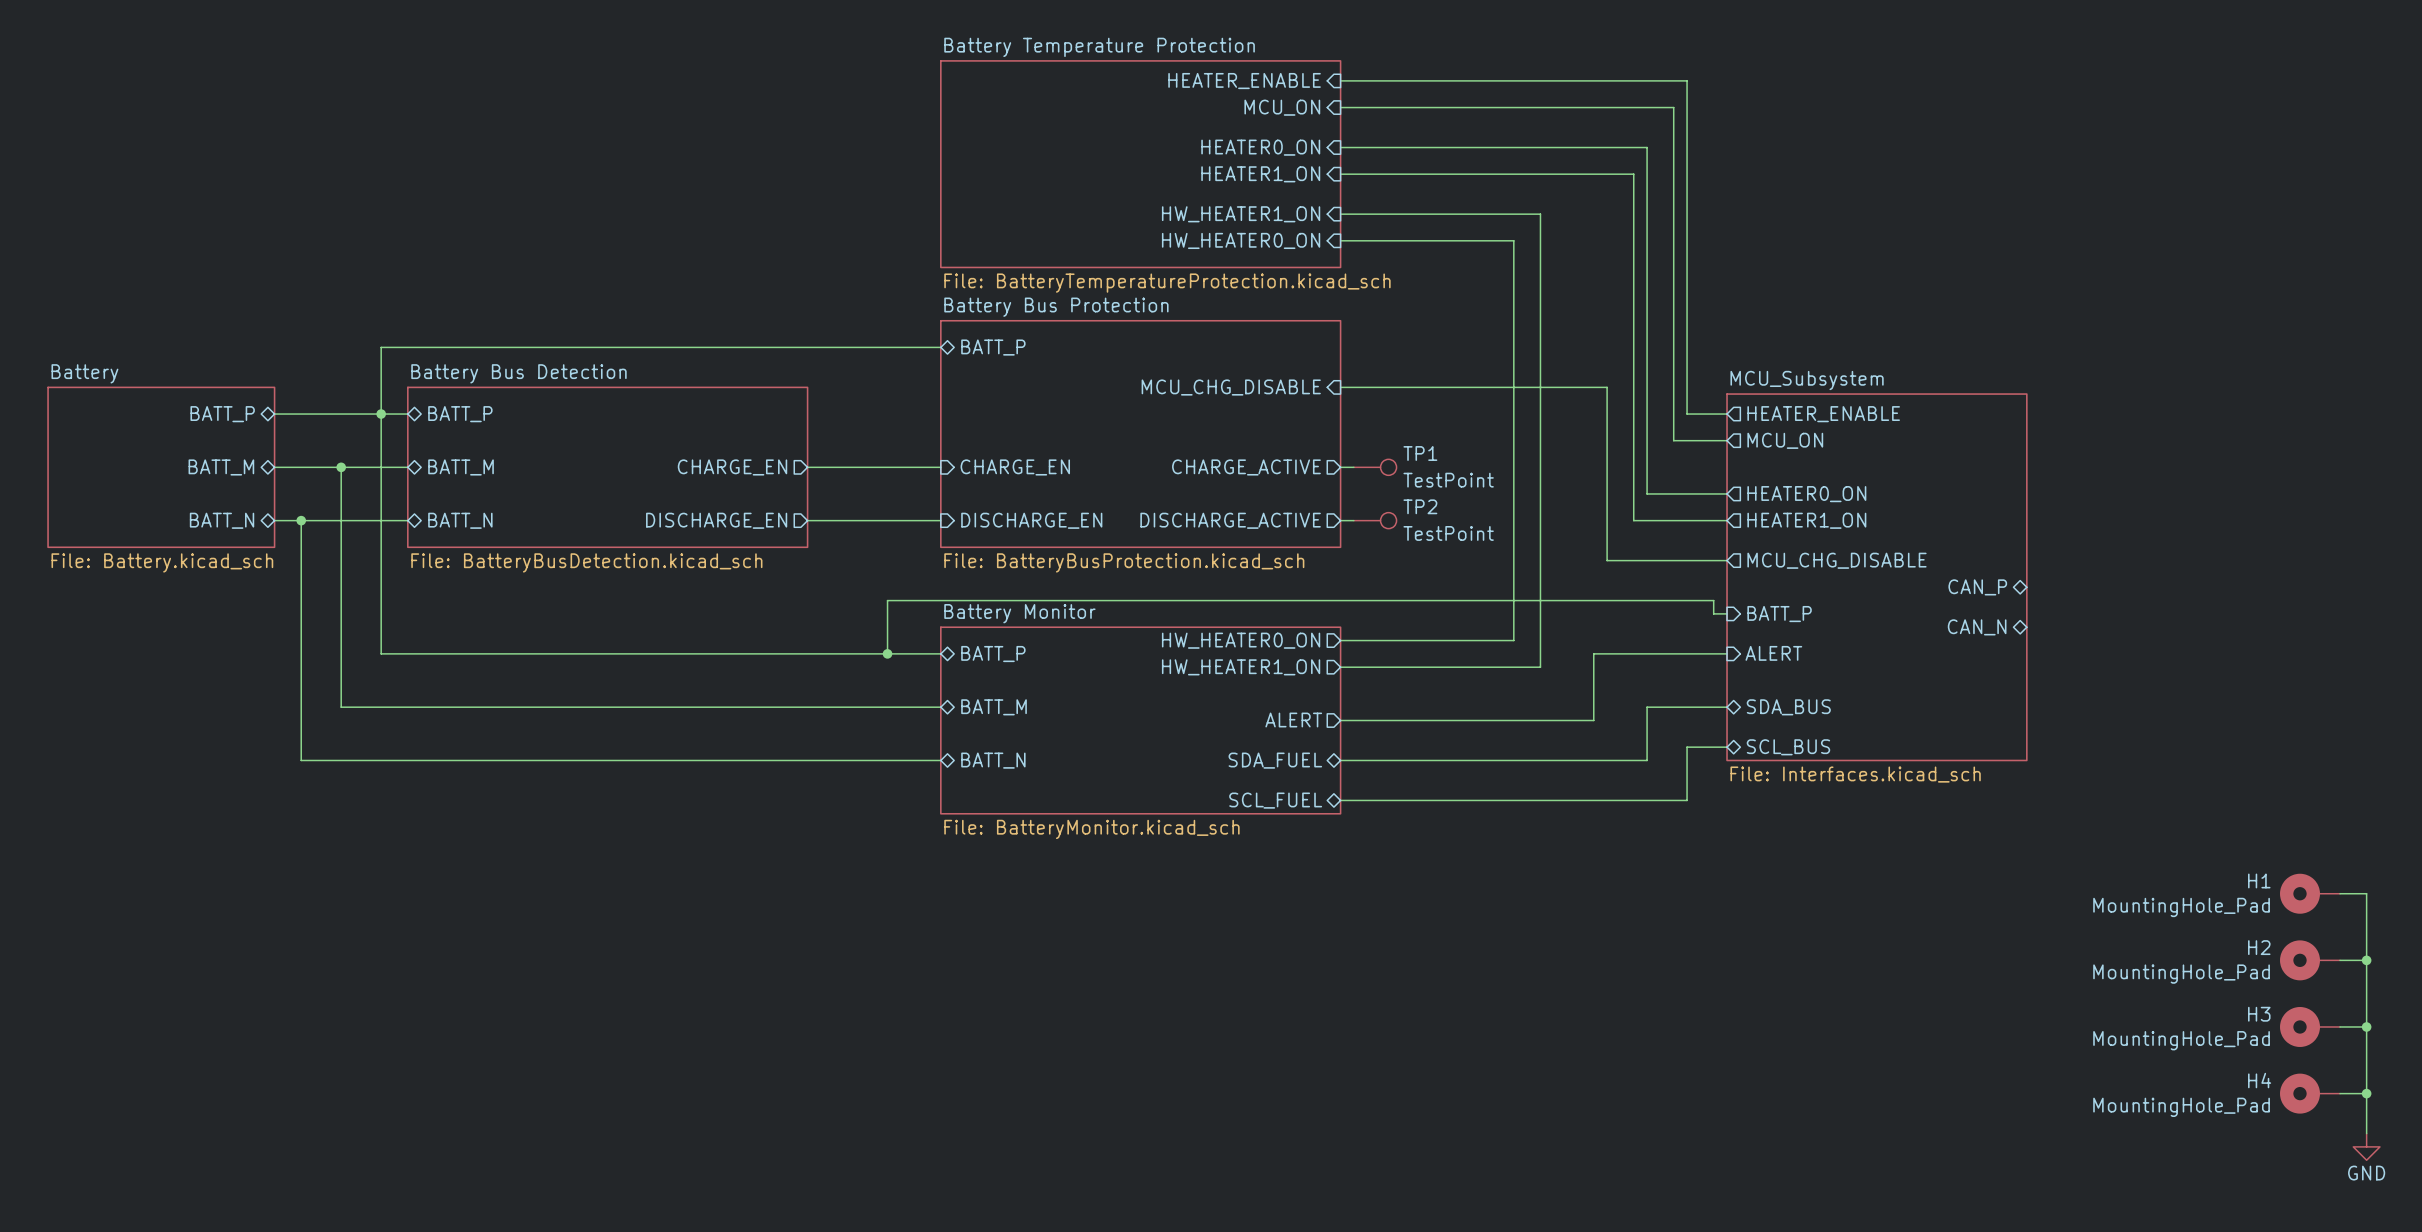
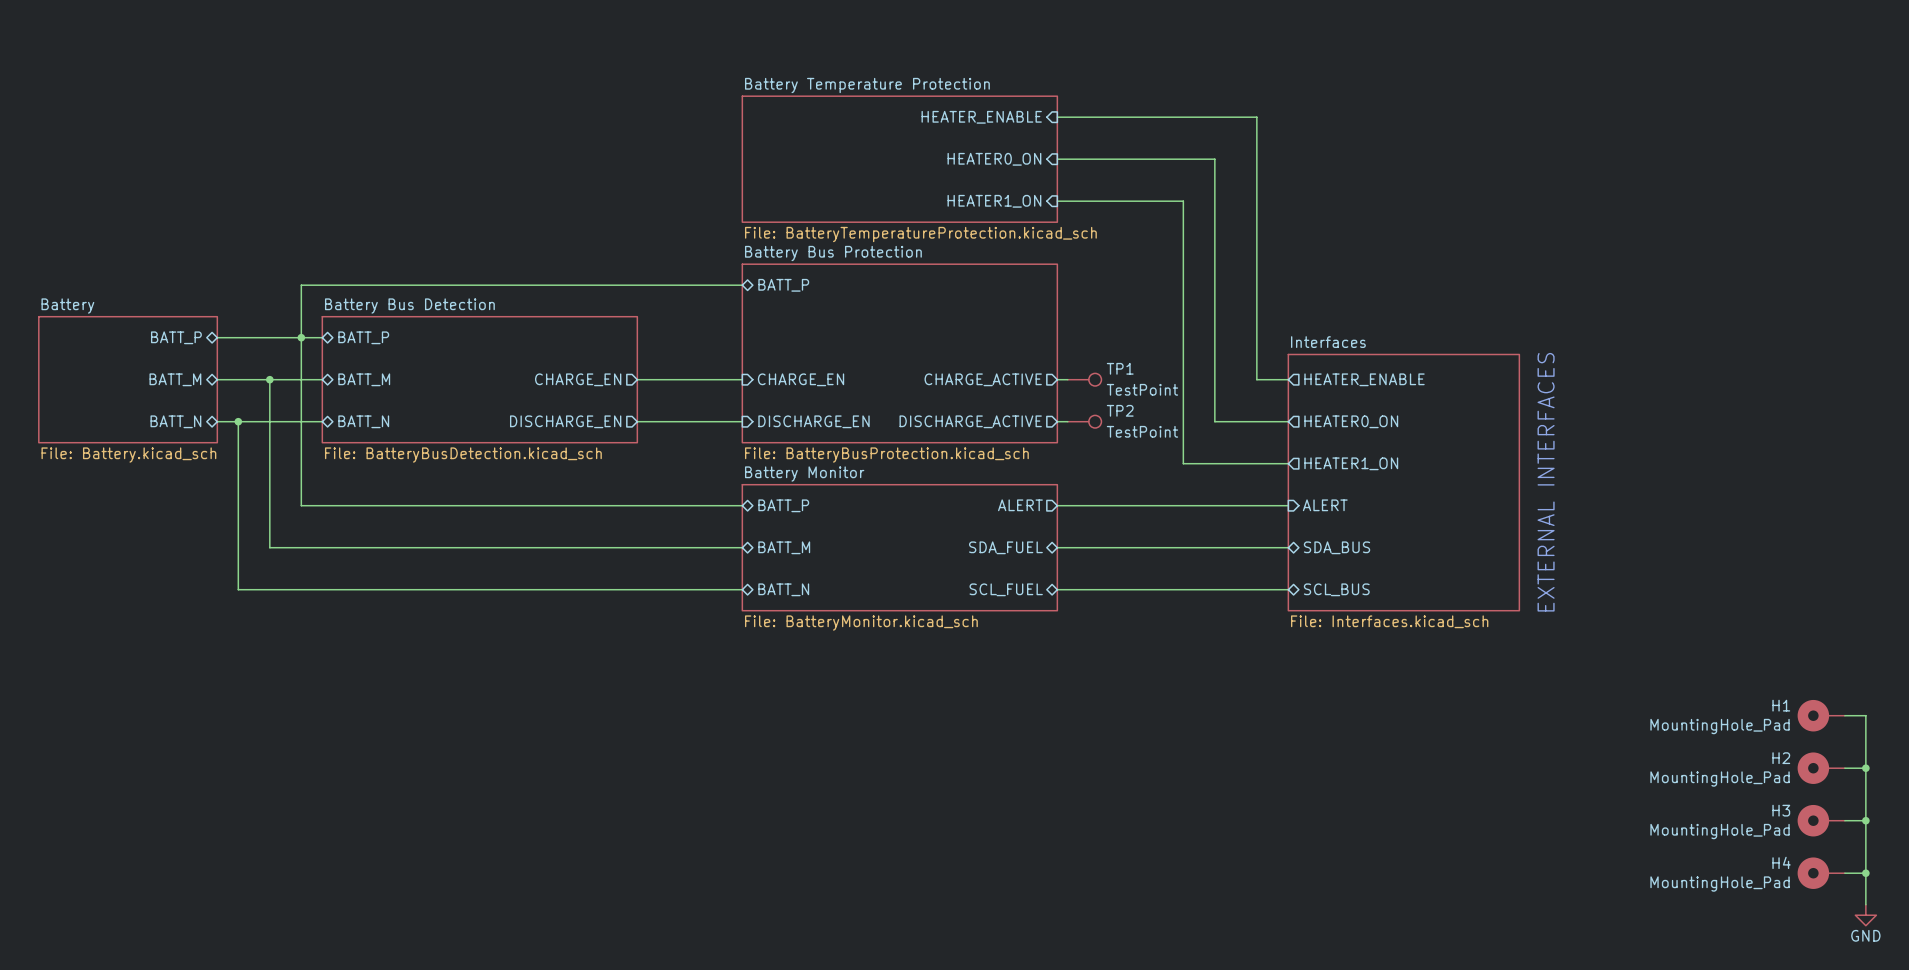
wire: (1340, 80) (1687, 80) (1687, 414) (1727, 414) -> none
sheet pin position: HEATER_ENABLE (1244, 81) -> HEATER_ENABLE (981, 117)
sheet pin: MCU_ON (1282, 107) -> none
wire: (1340, 107) (1673, 107) (1673, 440) (1727, 440) -> none
wire: none -> (1057, 117) (1256, 117) (1256, 379) (1288, 379)
sheet pin position: HEATER0_ON (1260, 147) -> HEATER0_ON (994, 159)
wire: (1340, 147) (1647, 147) (1647, 493) (1727, 493) -> none
sheet Battery Temperature Protection: File: BatteryTemperatureProtection.kicad_sch (1140, 164) -> none
sheet pin: HEATER1_ON (1260, 174) -> none
wire: (1340, 174) (1633, 174) (1633, 520) (1727, 520) -> none
sheet Battery Temperature Protection: none -> File: BatteryTemperatureProtection.kicad_sch (899, 159)
sheet pin: HW_HEATER1_ON (1241, 214) -> none
wire: (1340, 214) (1540, 214) -> (1057, 159) (1214, 159) (1214, 180)
sheet pin: HW_HEATER0_ON (1241, 240) -> HEATER1_ON (994, 201)
wire: (1500, 240) (1513, 240) (1513, 640) (1340, 640) -> (1183, 201) (1183, 463) (1288, 463)
sheet pin: MCU_CHG_DISABLE (1231, 387) -> none
wire: (1340, 387) (1607, 387) (1607, 560) (1727, 560) -> none
sheet pin position: HEATER_ENABLE (1823, 414) -> HEATER_ENABLE (1364, 379)
sheet pin: MCU_ON (1785, 440) -> none
sheet pin position: HEATER0_ON (1806, 494) -> HEATER0_ON (1351, 421)
wire: (1540, 520) (1540, 667) (1340, 667) -> (1214, 421) (1288, 421)
sheet pin position: HEATER1_ON (1806, 520) -> HEATER1_ON (1351, 463)
sheet pin: MCU_CHG_DISABLE (1837, 560) -> none
sheet MCU_Subsystem: File: Interfaces.kicad_sch (1876, 577) -> none
sheet pin: CAN_P (1977, 587) -> none
sheet Interfaces: none -> File: Interfaces.kicad_sch (1403, 482)
text: none -> EXTERNAL INTERFACES (1546, 482)
wire: (1727, 613) (1713, 613) (1713, 600) (887, 600) (887, 653) -> none
sheet pin: BATT_P (1779, 614) -> none
wire: (381, 627) (381, 653) (940, 653) -> (301, 505) (742, 505)
wire: none -> (1057, 505) (1288, 505)
sheet pin: CAN_N (1977, 627) -> none
sheet pin: HW_HEATER0_ON (1241, 640) -> none
junction: (887, 653) -> none
wire: (1727, 653) (1593, 653) (1593, 720) (1340, 720) -> none
sheet pin position: ALERT (1773, 653) -> ALERT (1325, 505)
sheet pin position: BATT_P (993, 654) -> BATT_P (783, 505)
sheet pin: HW_HEATER1_ON (1241, 667) -> none
wire: (341, 680) (341, 707) (940, 707) -> (269, 547) (742, 547)
sheet Battery Monitor: none -> File: BatteryMonitor.kicad_sch (899, 547)
wire: none -> (1057, 547) (1288, 547)
sheet pin position: BATT_M (994, 707) -> BATT_M (784, 547)
wire: (1727, 707) (1647, 707) (1647, 760) (1340, 760) -> none
sheet pin position: SDA_BUS (1788, 707) -> SDA_BUS (1337, 547)
sheet Battery Monitor: File: BatteryMonitor.kicad_sch (1140, 720) -> none
sheet pin position: ALERT (1293, 720) -> ALERT (1020, 505)
wire: (301, 733) (301, 760) (940, 760) -> (238, 589) (742, 589)
wire: none -> (1057, 589) (1288, 589)
wire: (1727, 747) (1687, 747) (1687, 800) (1340, 800) -> none
sheet pin position: SCL_BUS (1788, 747) -> SCL_BUS (1336, 589)
sheet pin position: BATT_N (993, 760) -> BATT_N (783, 589)
sheet pin position: SDA_FUEL (1275, 760) -> SDA_FUEL (1005, 547)
sheet pin position: SCL_FUEL (1275, 800) -> SCL_FUEL (1006, 589)

